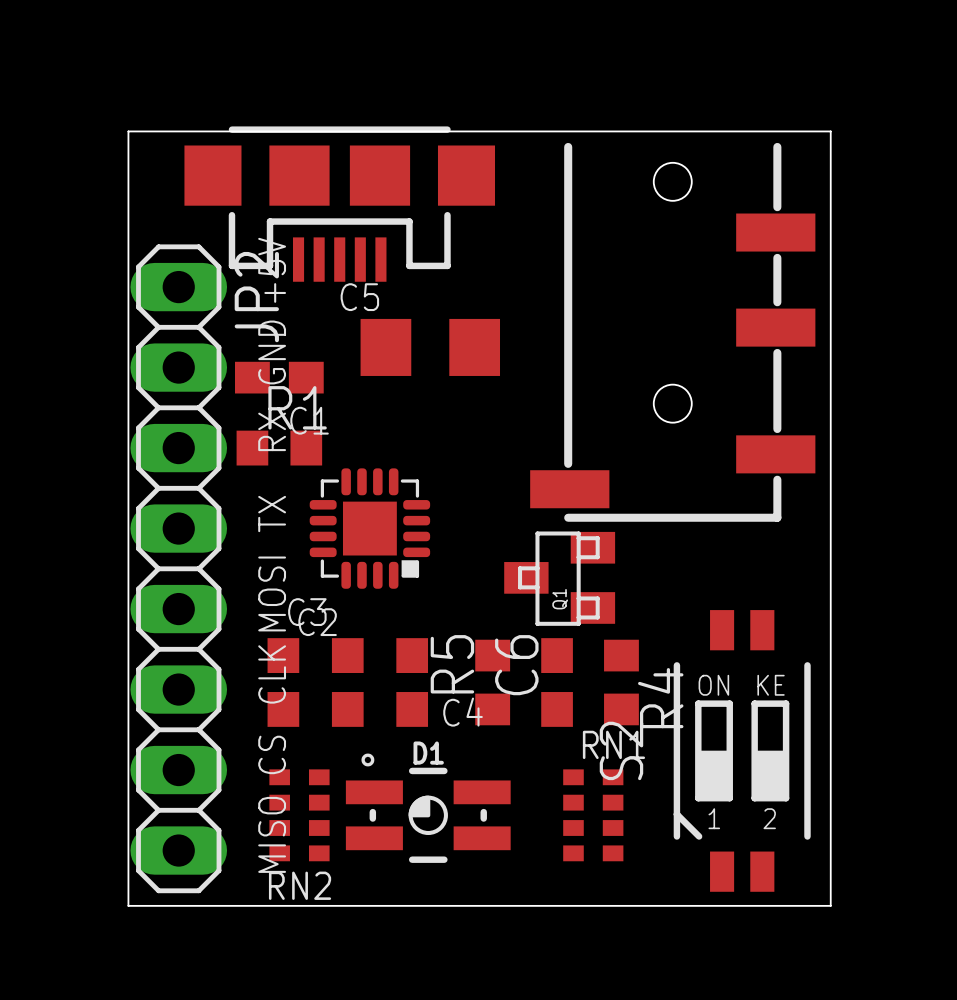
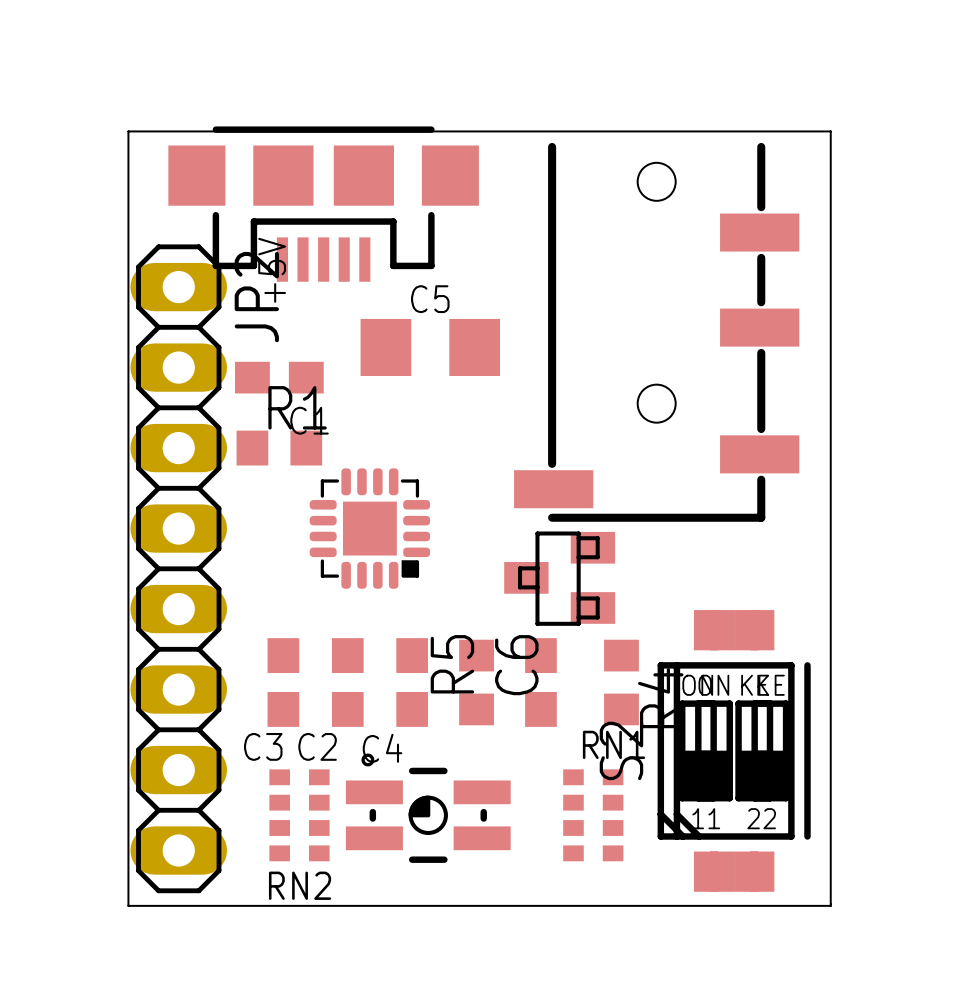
part position: (339, 204) -> (323, 204)
C5 name position: C5 (359, 297) -> C5 (430, 299)
part position: (672, 332) -> (656, 332)
text: GND (272, 352) -> none
text: RX (272, 431) -> none
text: TX (272, 514) -> none
text: MOSI (272, 593) -> none
Q1 name: Q1 (560, 599) -> none
C3 name position: C3 (307, 612) -> C3 (263, 746)
C2 name position: C2 (317, 622) -> C2 (317, 746)
text: CLK (272, 674) -> none
R5 position: (492, 682) -> (476, 682)
C6 position: (557, 682) -> (540, 682)
C4 name position: C4 (463, 712) -> C4 (382, 748)
part: none -> (726, 750)
D1 name: D1 (428, 753) -> none
text: CS (272, 754) -> none
text: MISO (272, 834) -> none

